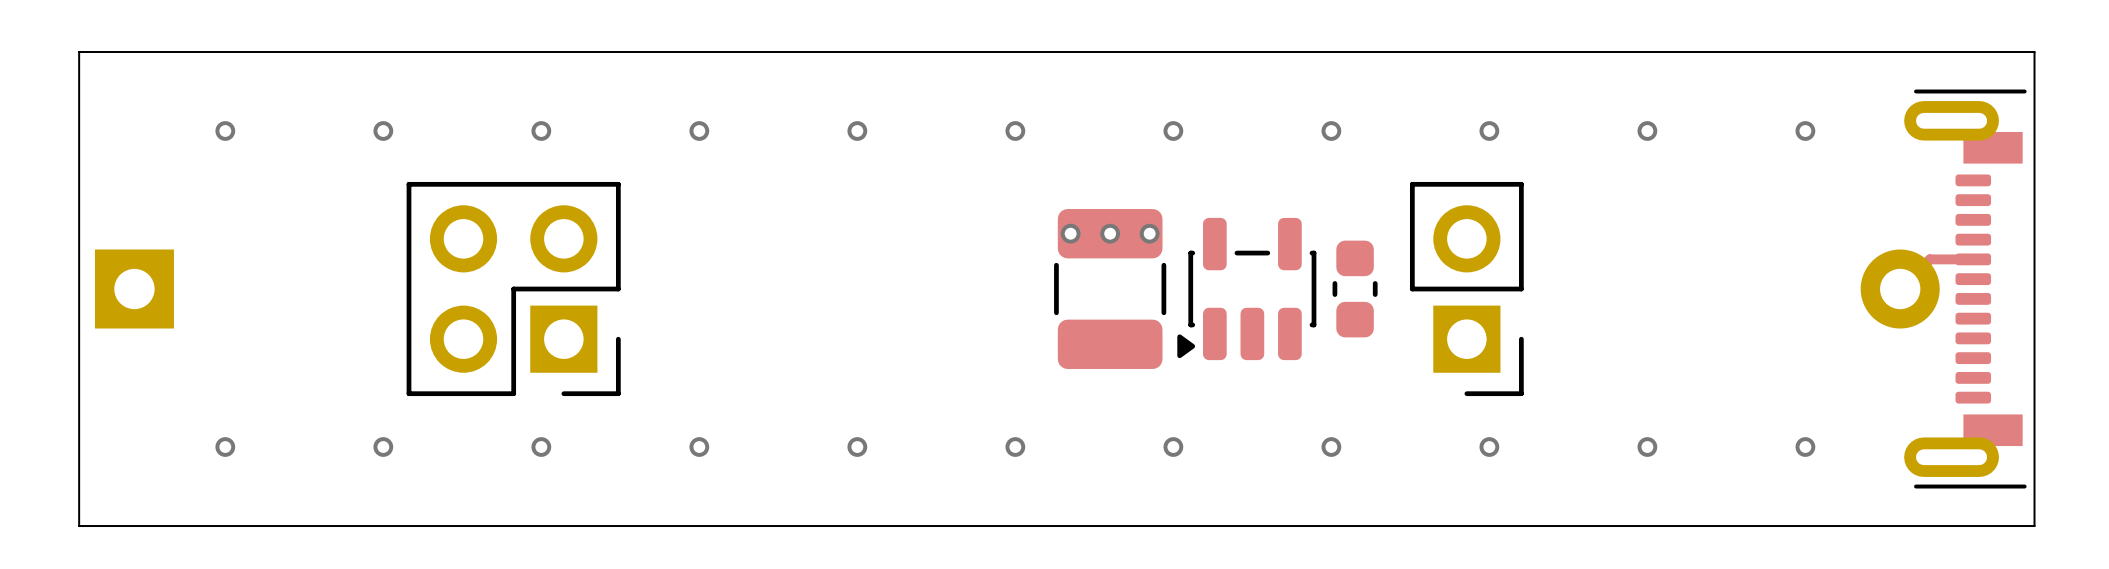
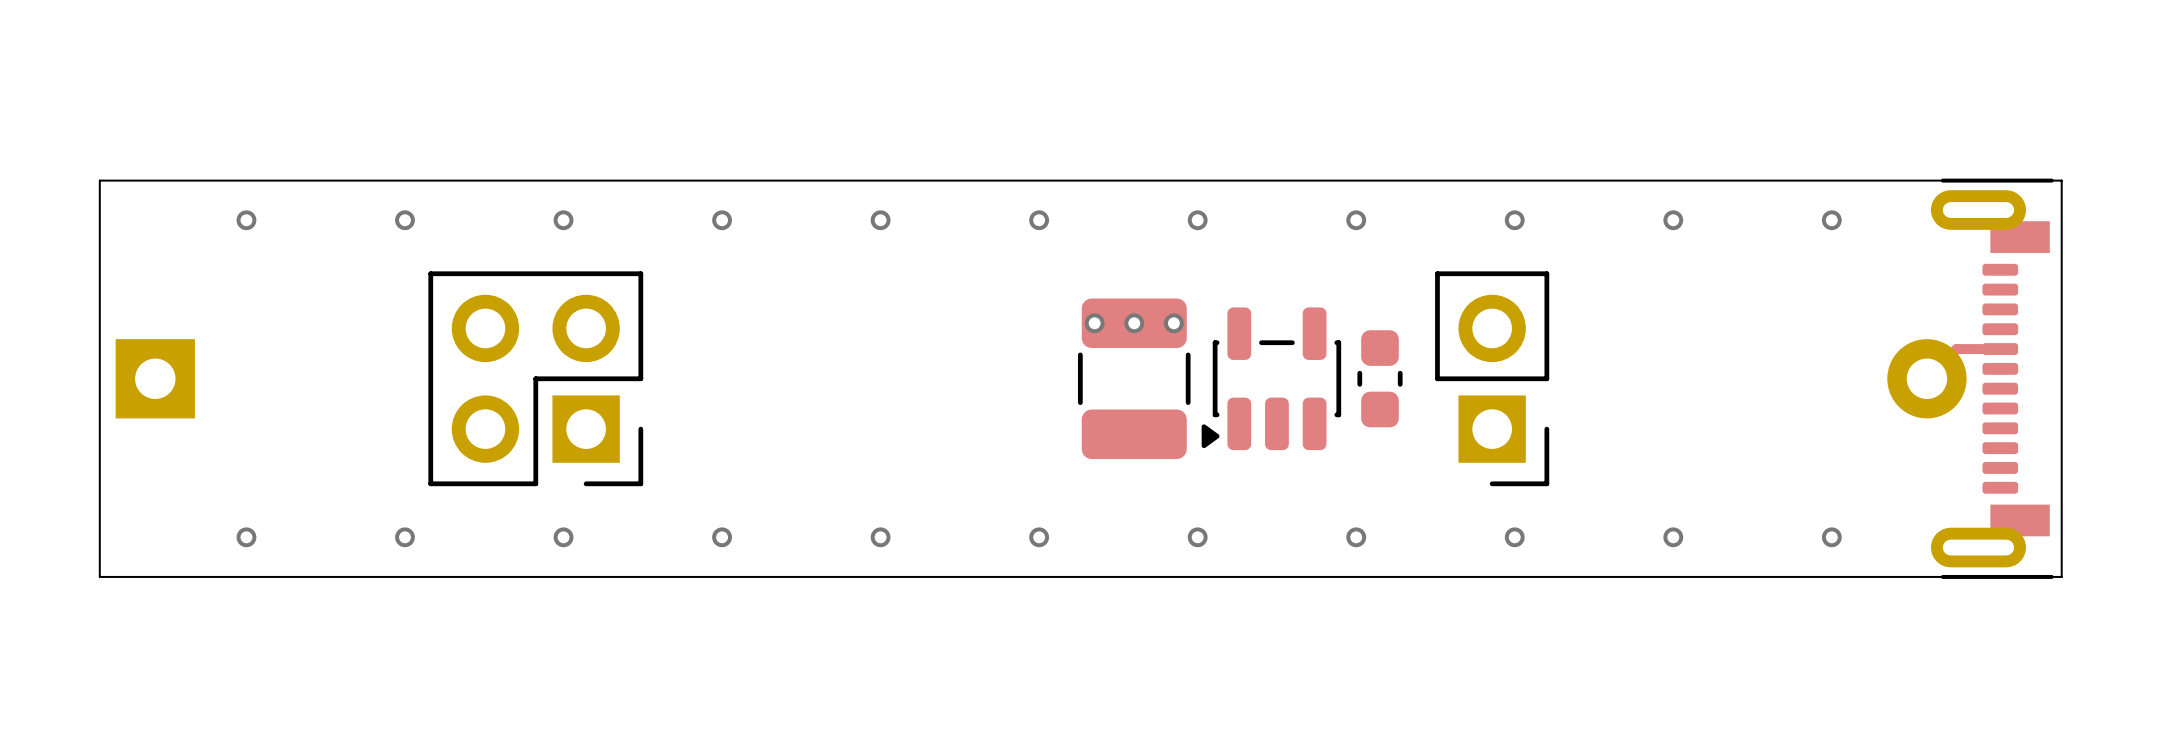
board edge: (79, 91) (79, 51) (2034, 51) (2034, 91) -> (99, 180) (2061, 180)
board edge: (79, 486) (79, 526) (2034, 526) (2034, 486) -> (99, 576) (2061, 576)

